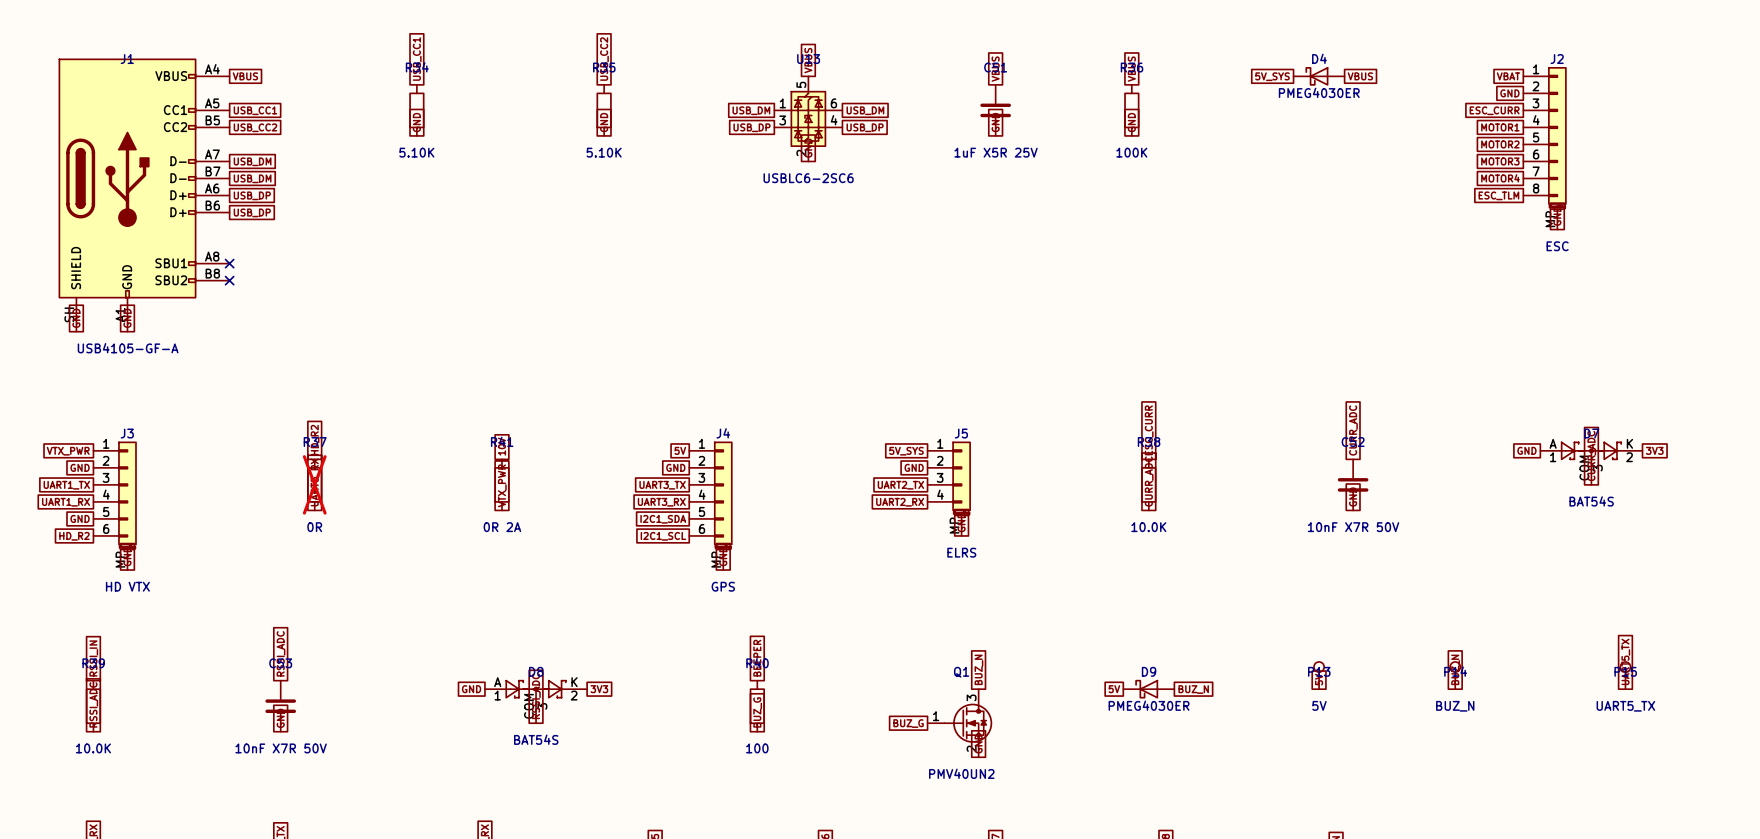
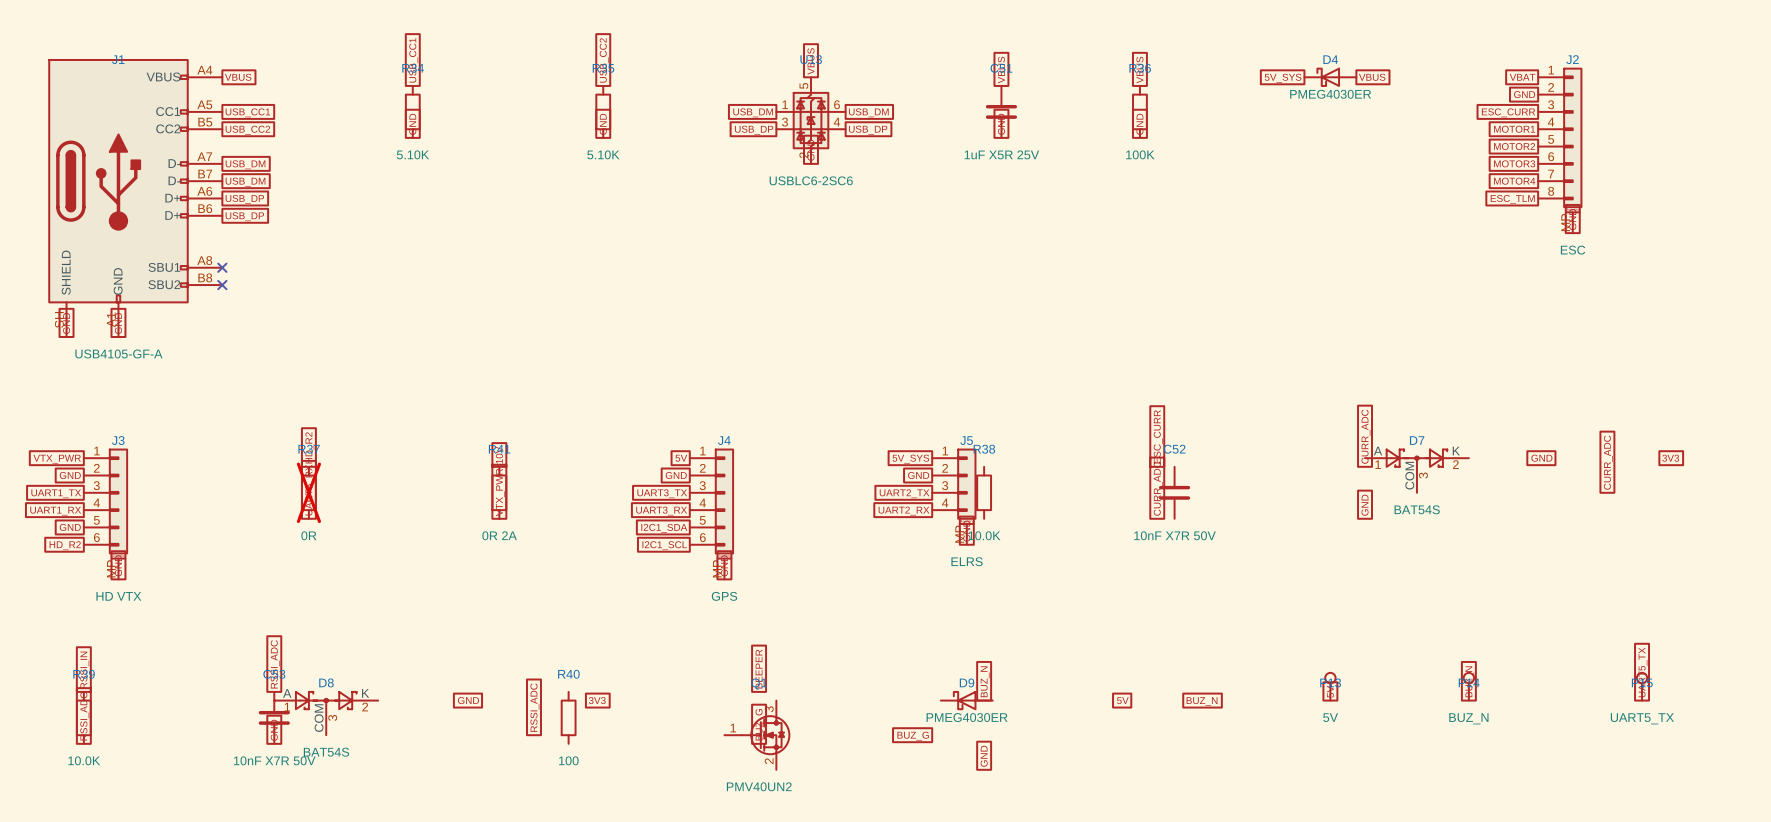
D7 position: (1591, 463) -> (1416, 471)
R38 position: (1148, 484) -> (984, 492)
C52 position: (1353, 484) -> (1174, 492)
D9 position: (1148, 689) -> (966, 700)
D8 position: (536, 701) -> (326, 713)
R40 position: (757, 706) -> (568, 717)
Q1 position: (959, 723) -> (757, 735)

